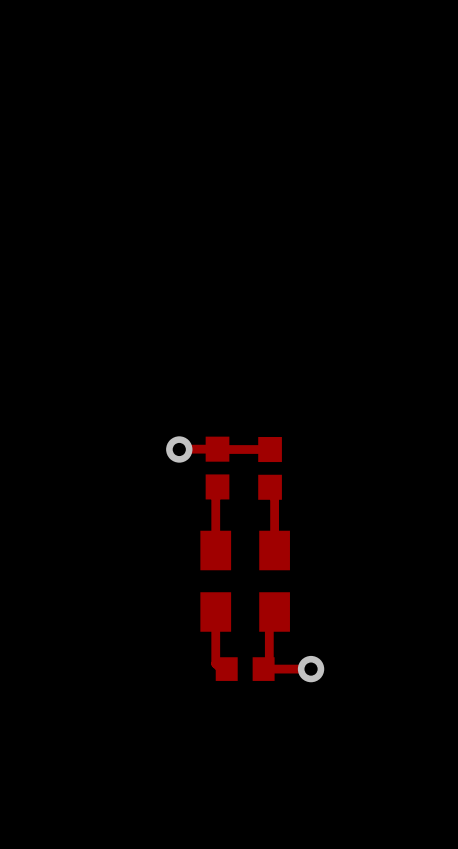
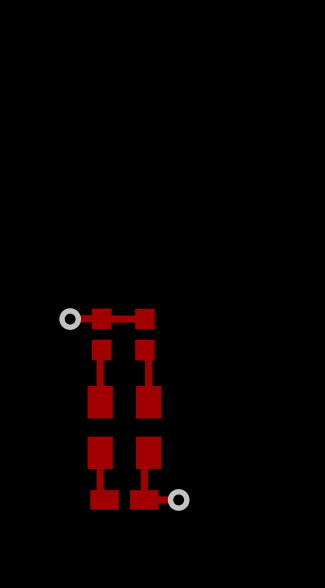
part footprint: [215, 657, 275, 681] -> [90, 490, 159, 510]

